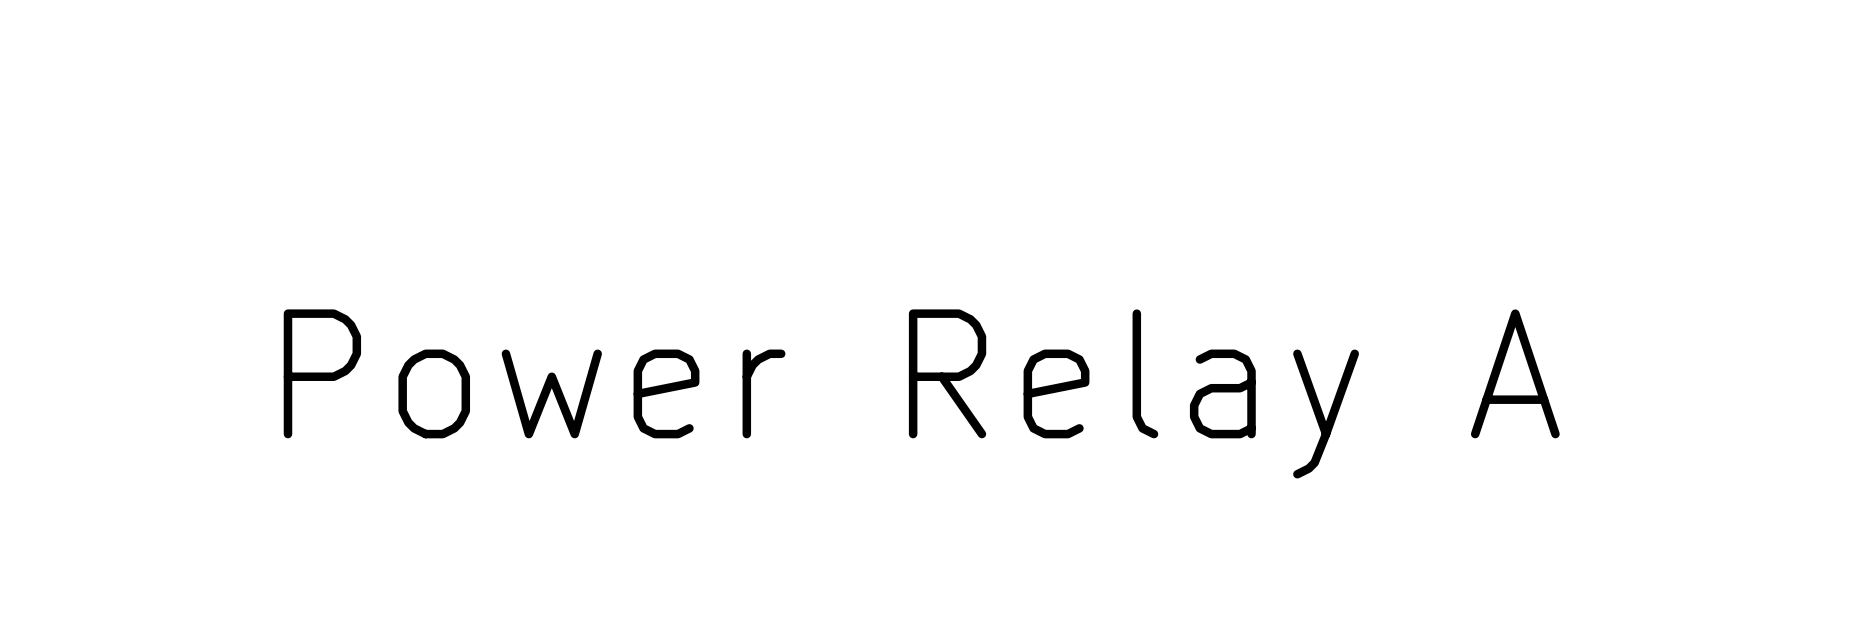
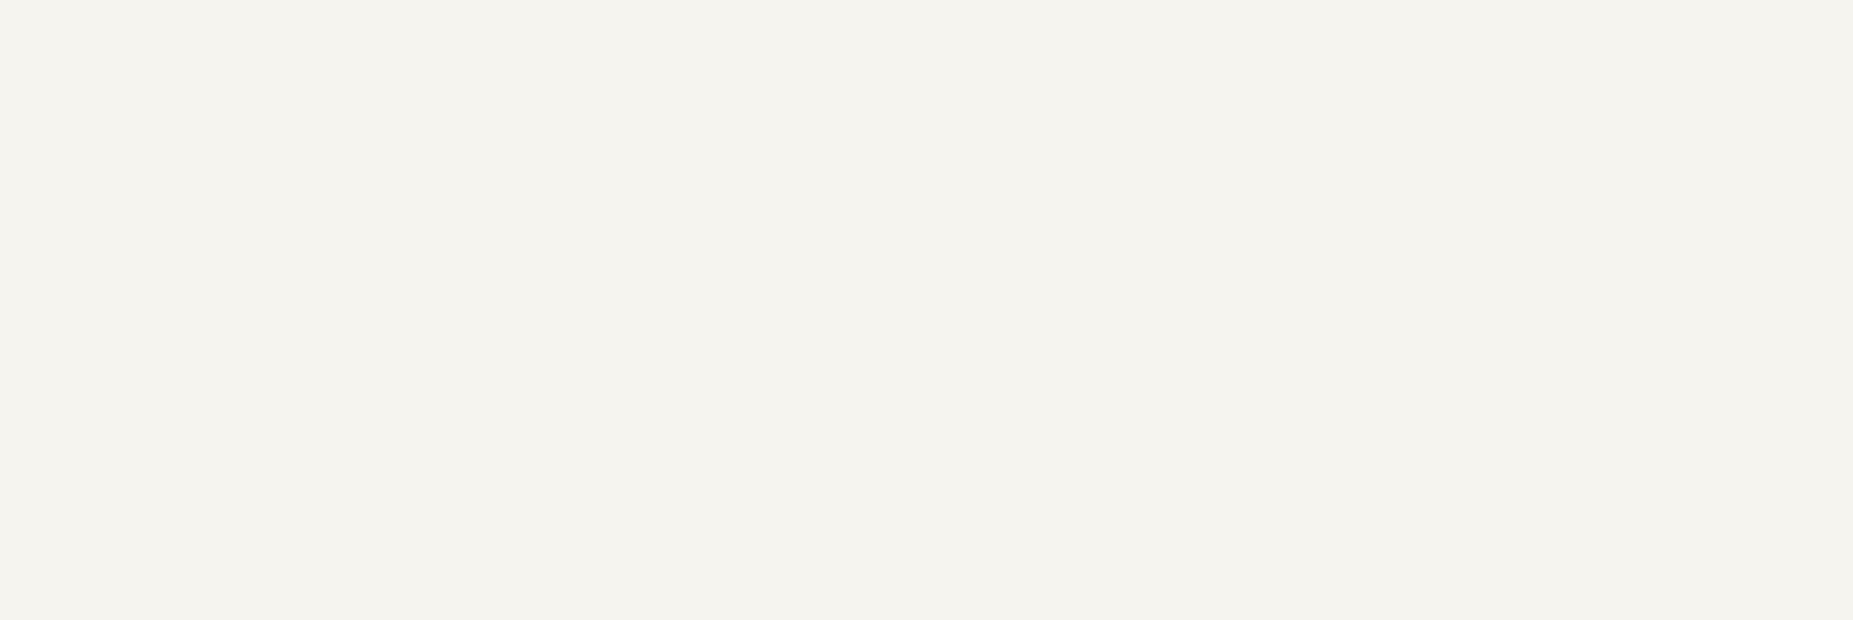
text: Power Relay A (921, 393) -> none

